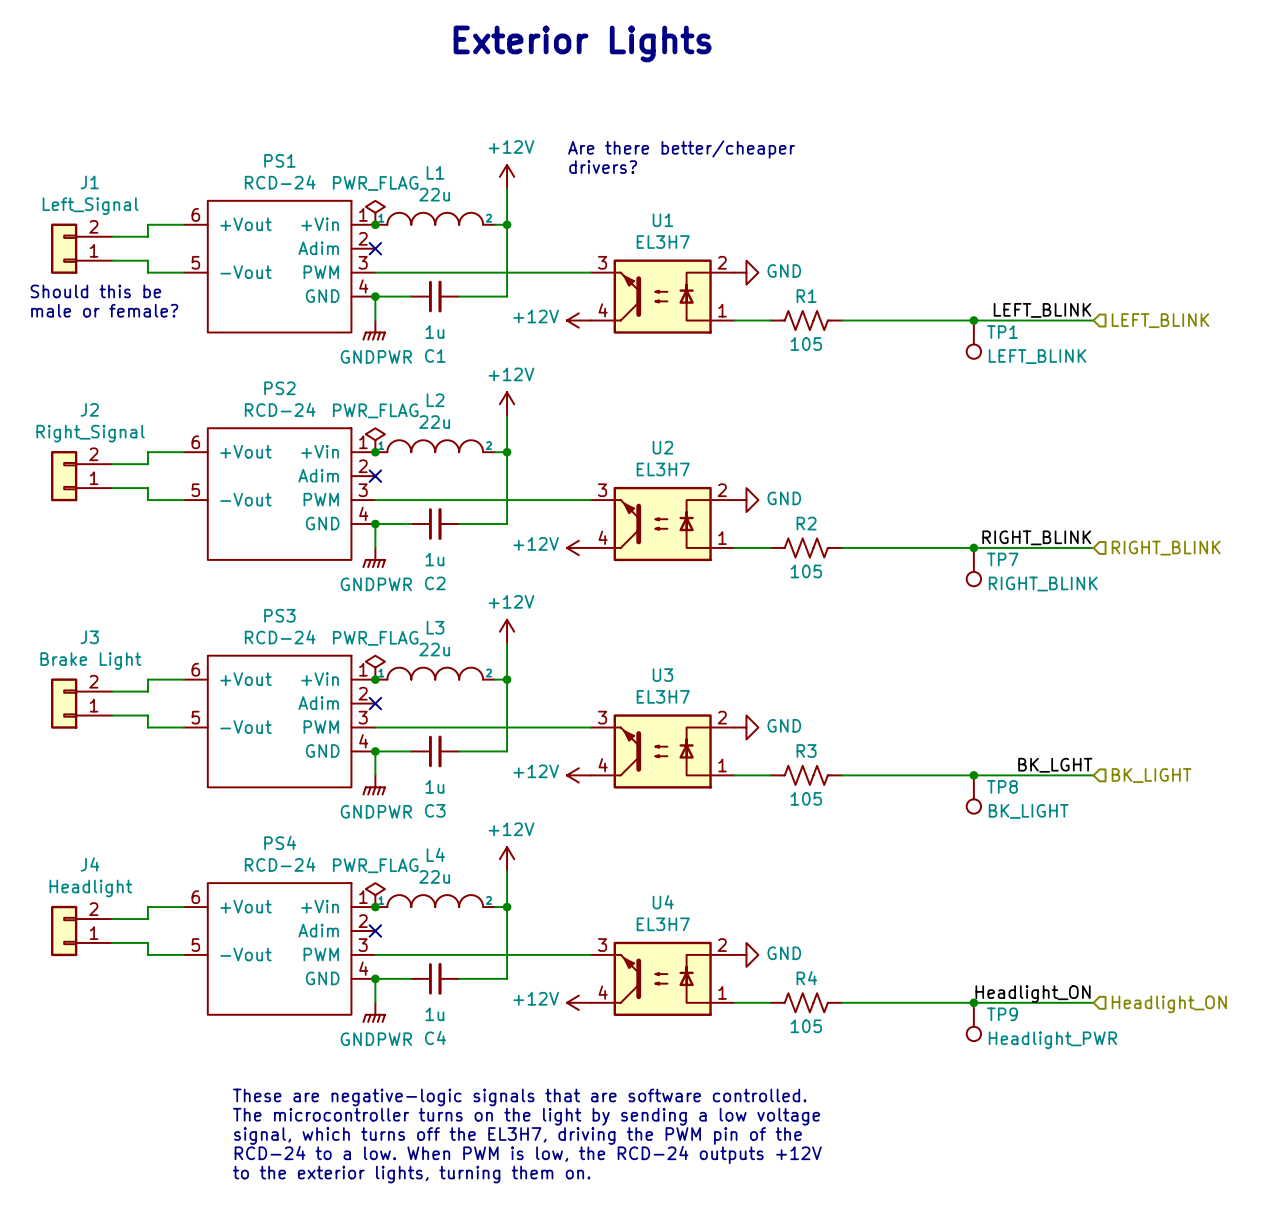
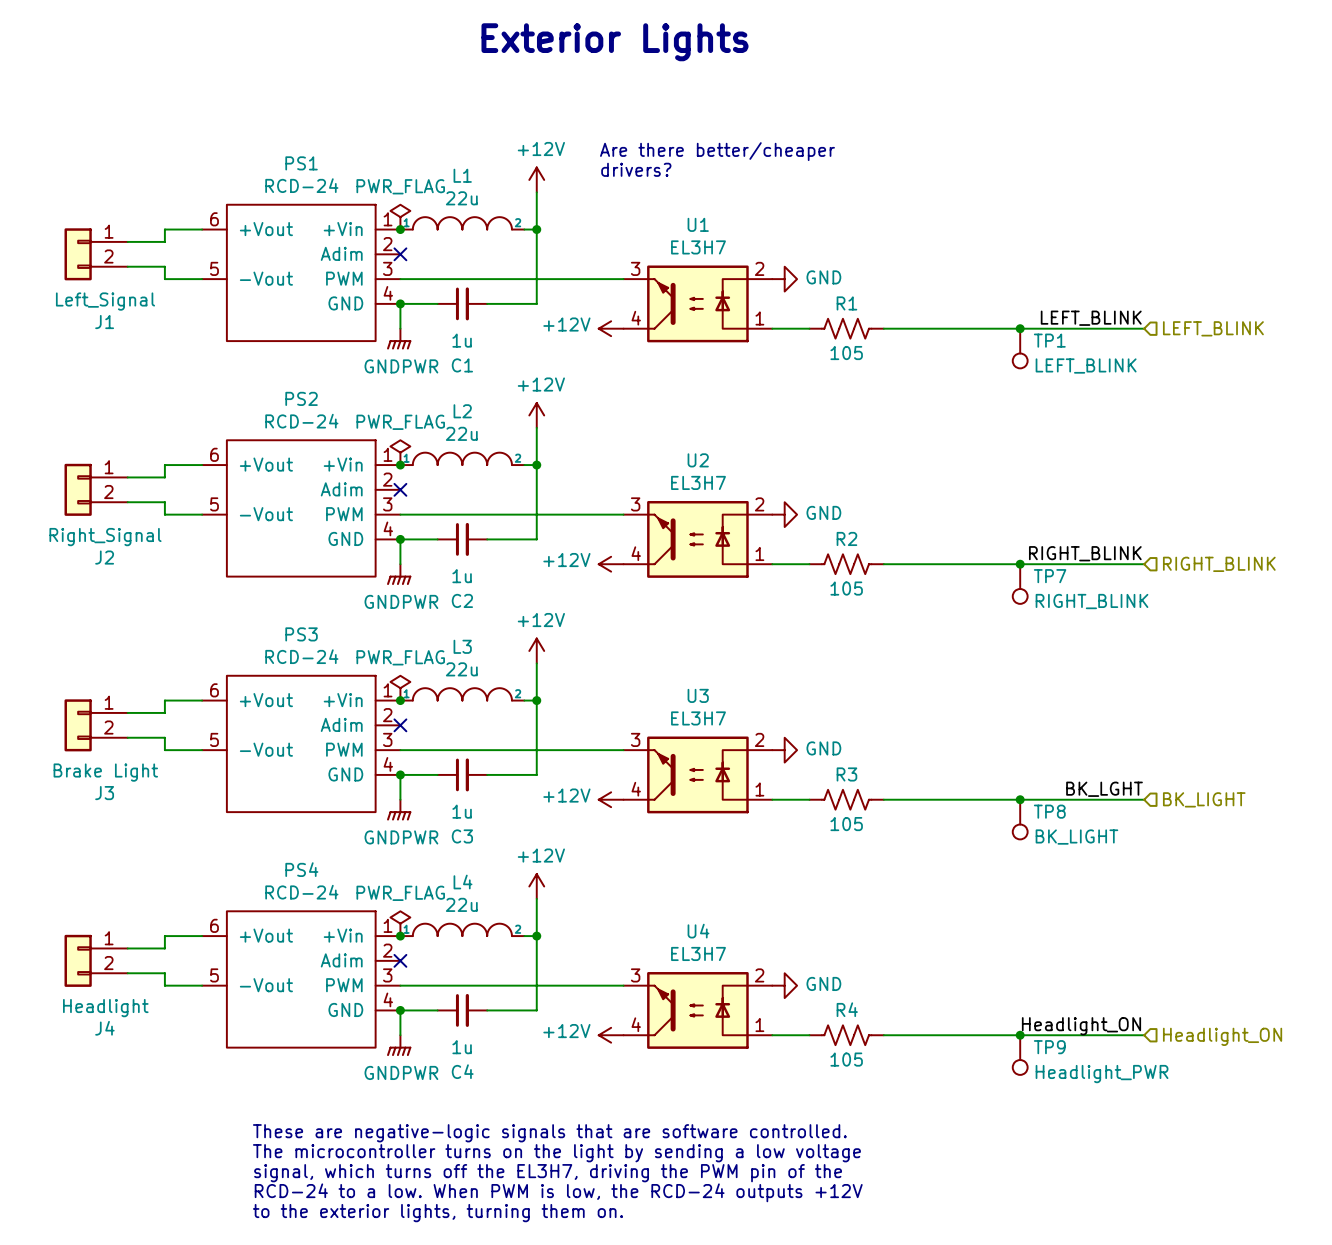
J1 flip: as is (64, 248) -> up-down (78, 254)
text: Should this be (95, 291) -> none
text: male or female? (104, 310) -> none
J2 flip: as is (64, 476) -> up-down (78, 489)
J3 flip: as is (64, 703) -> up-down (78, 725)
J4 flip: as is (64, 930) -> up-down (78, 960)

